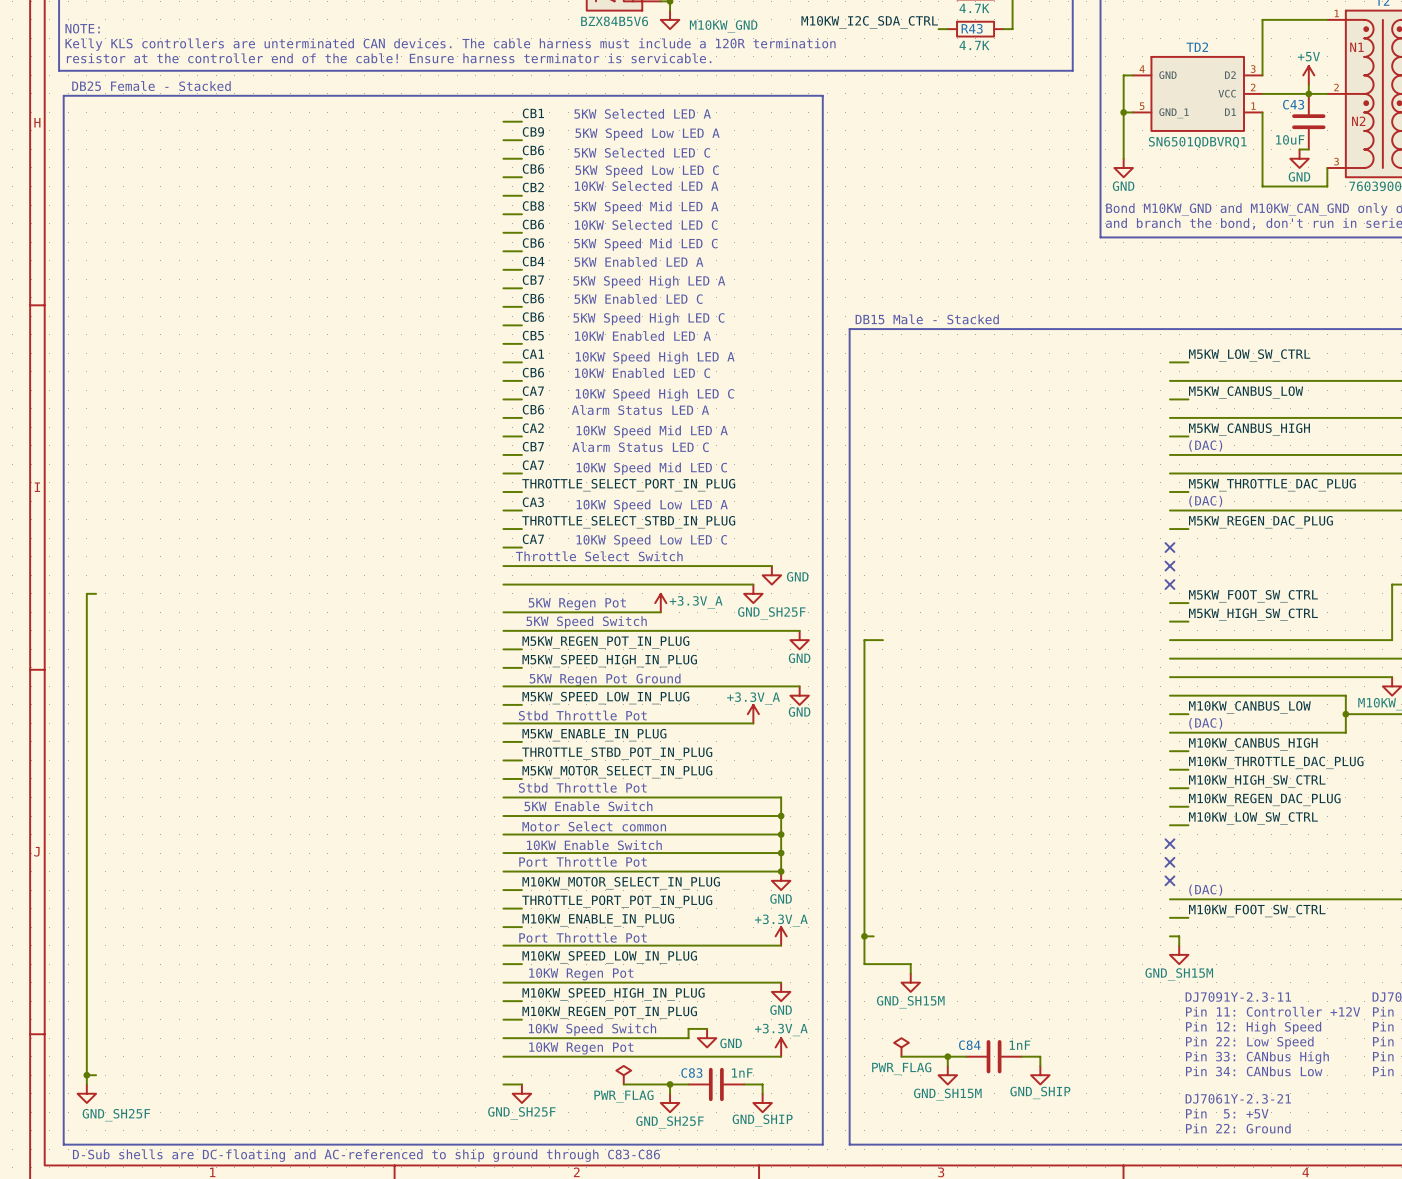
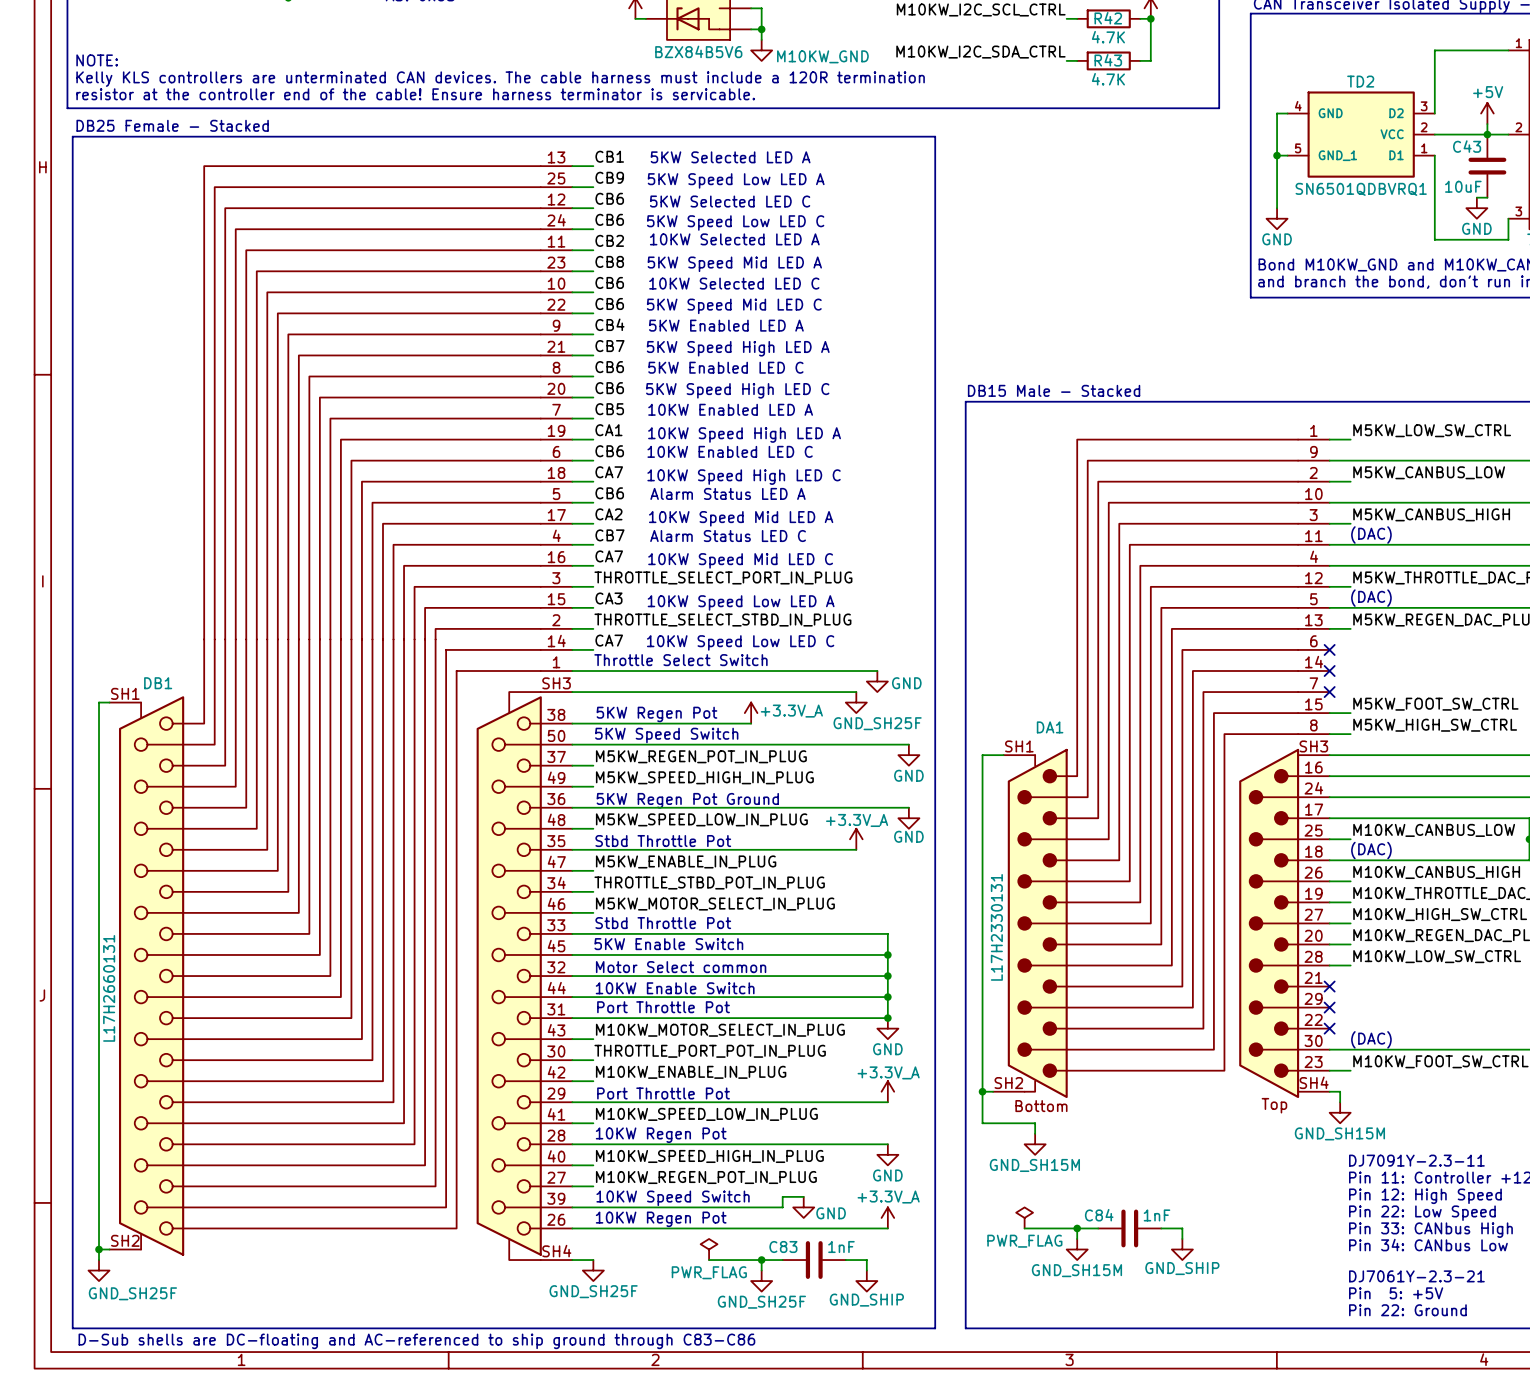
DB1: none -> L17H2660131 (340, 713)
DA1: none -> L17H2330131 (1161, 768)

